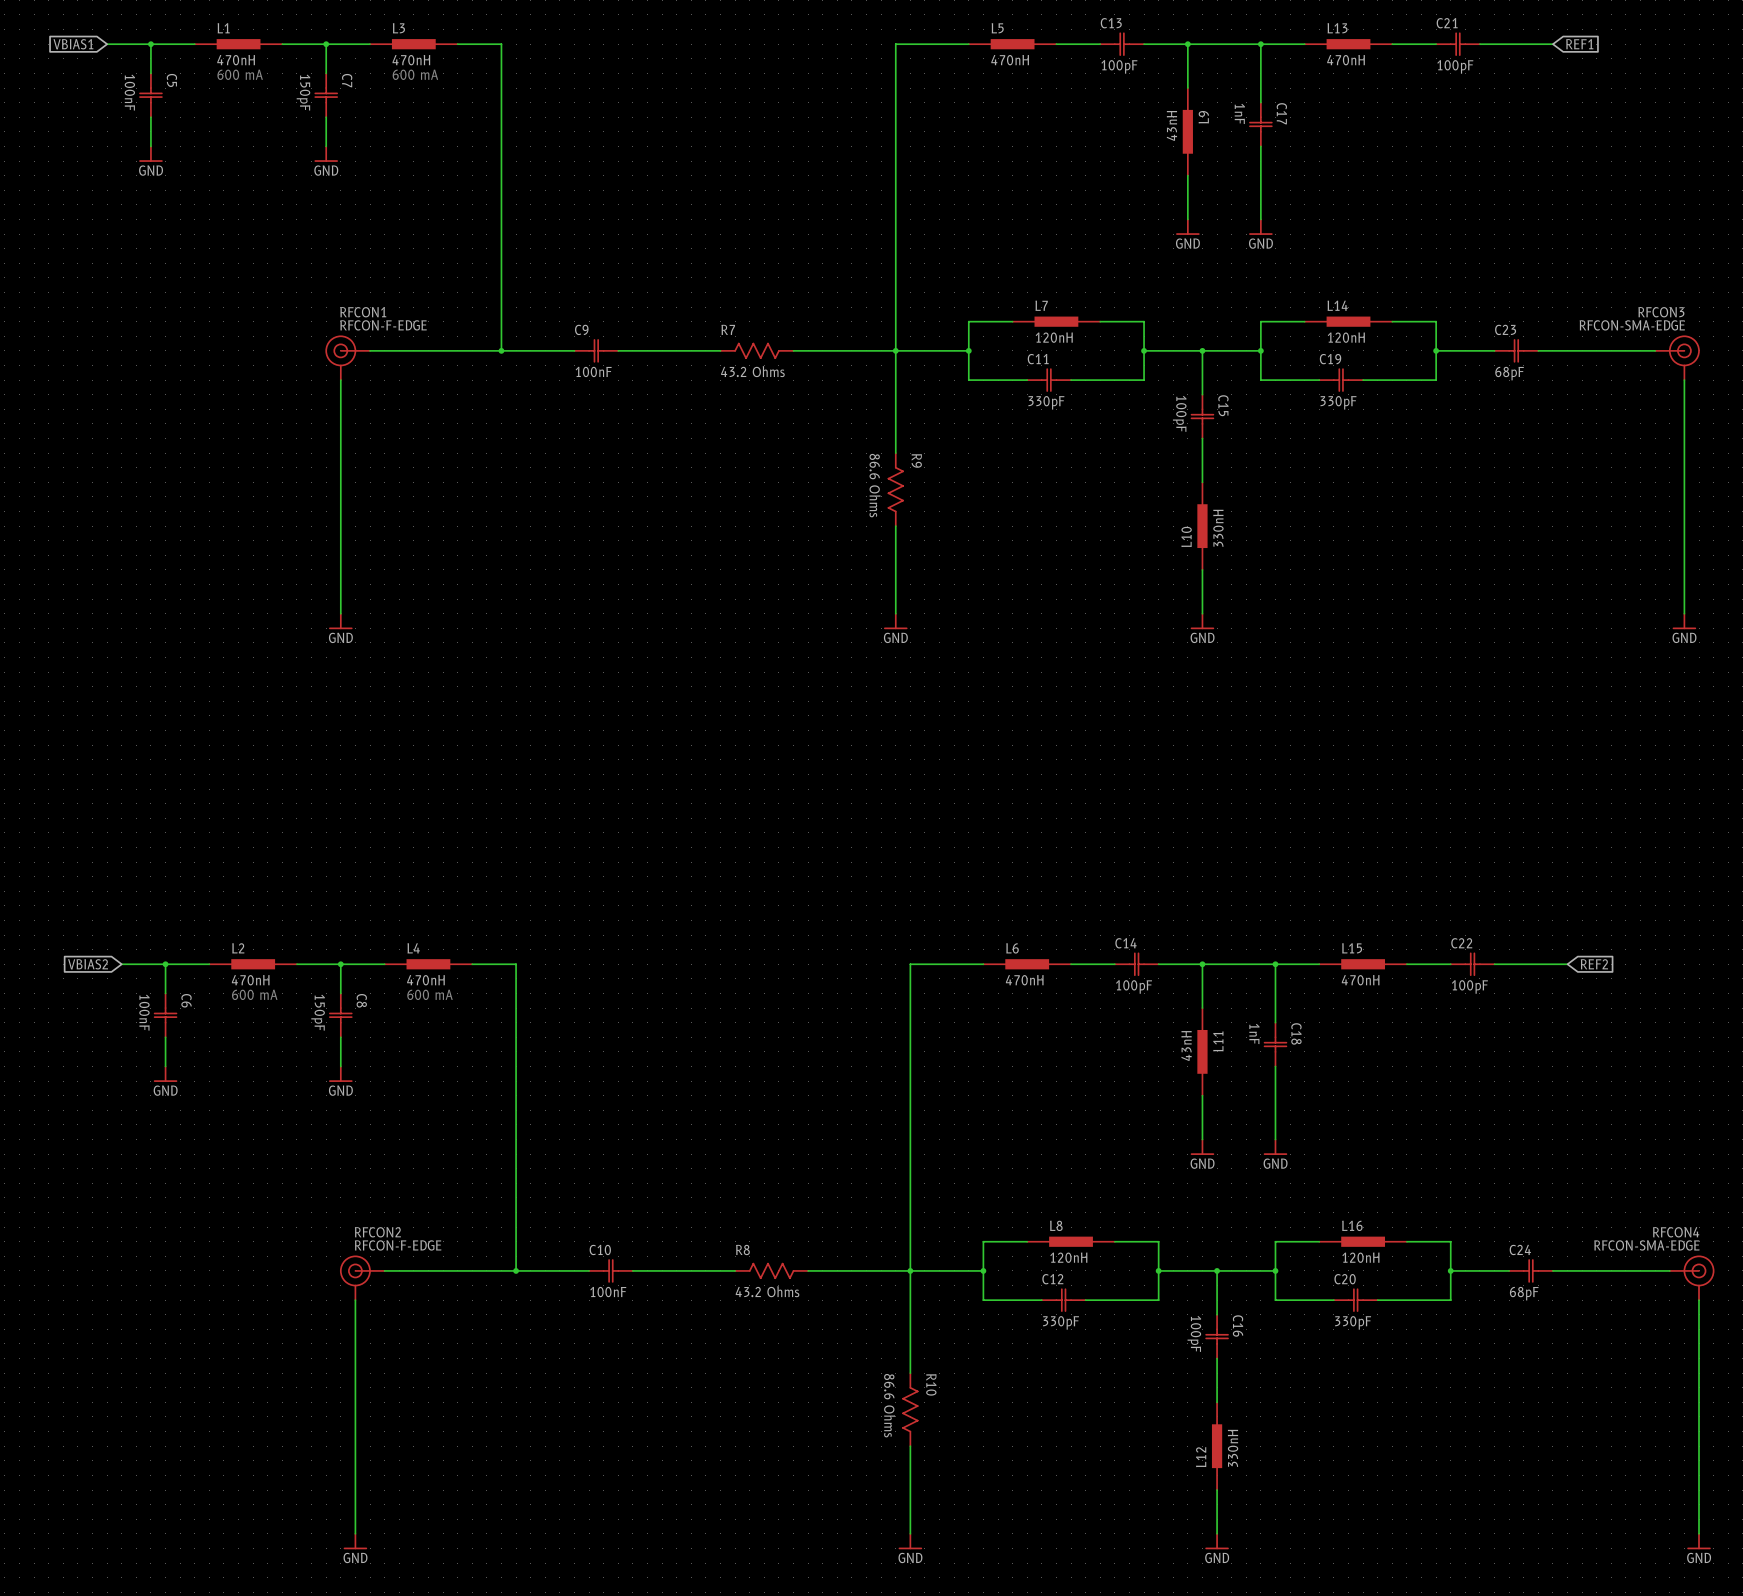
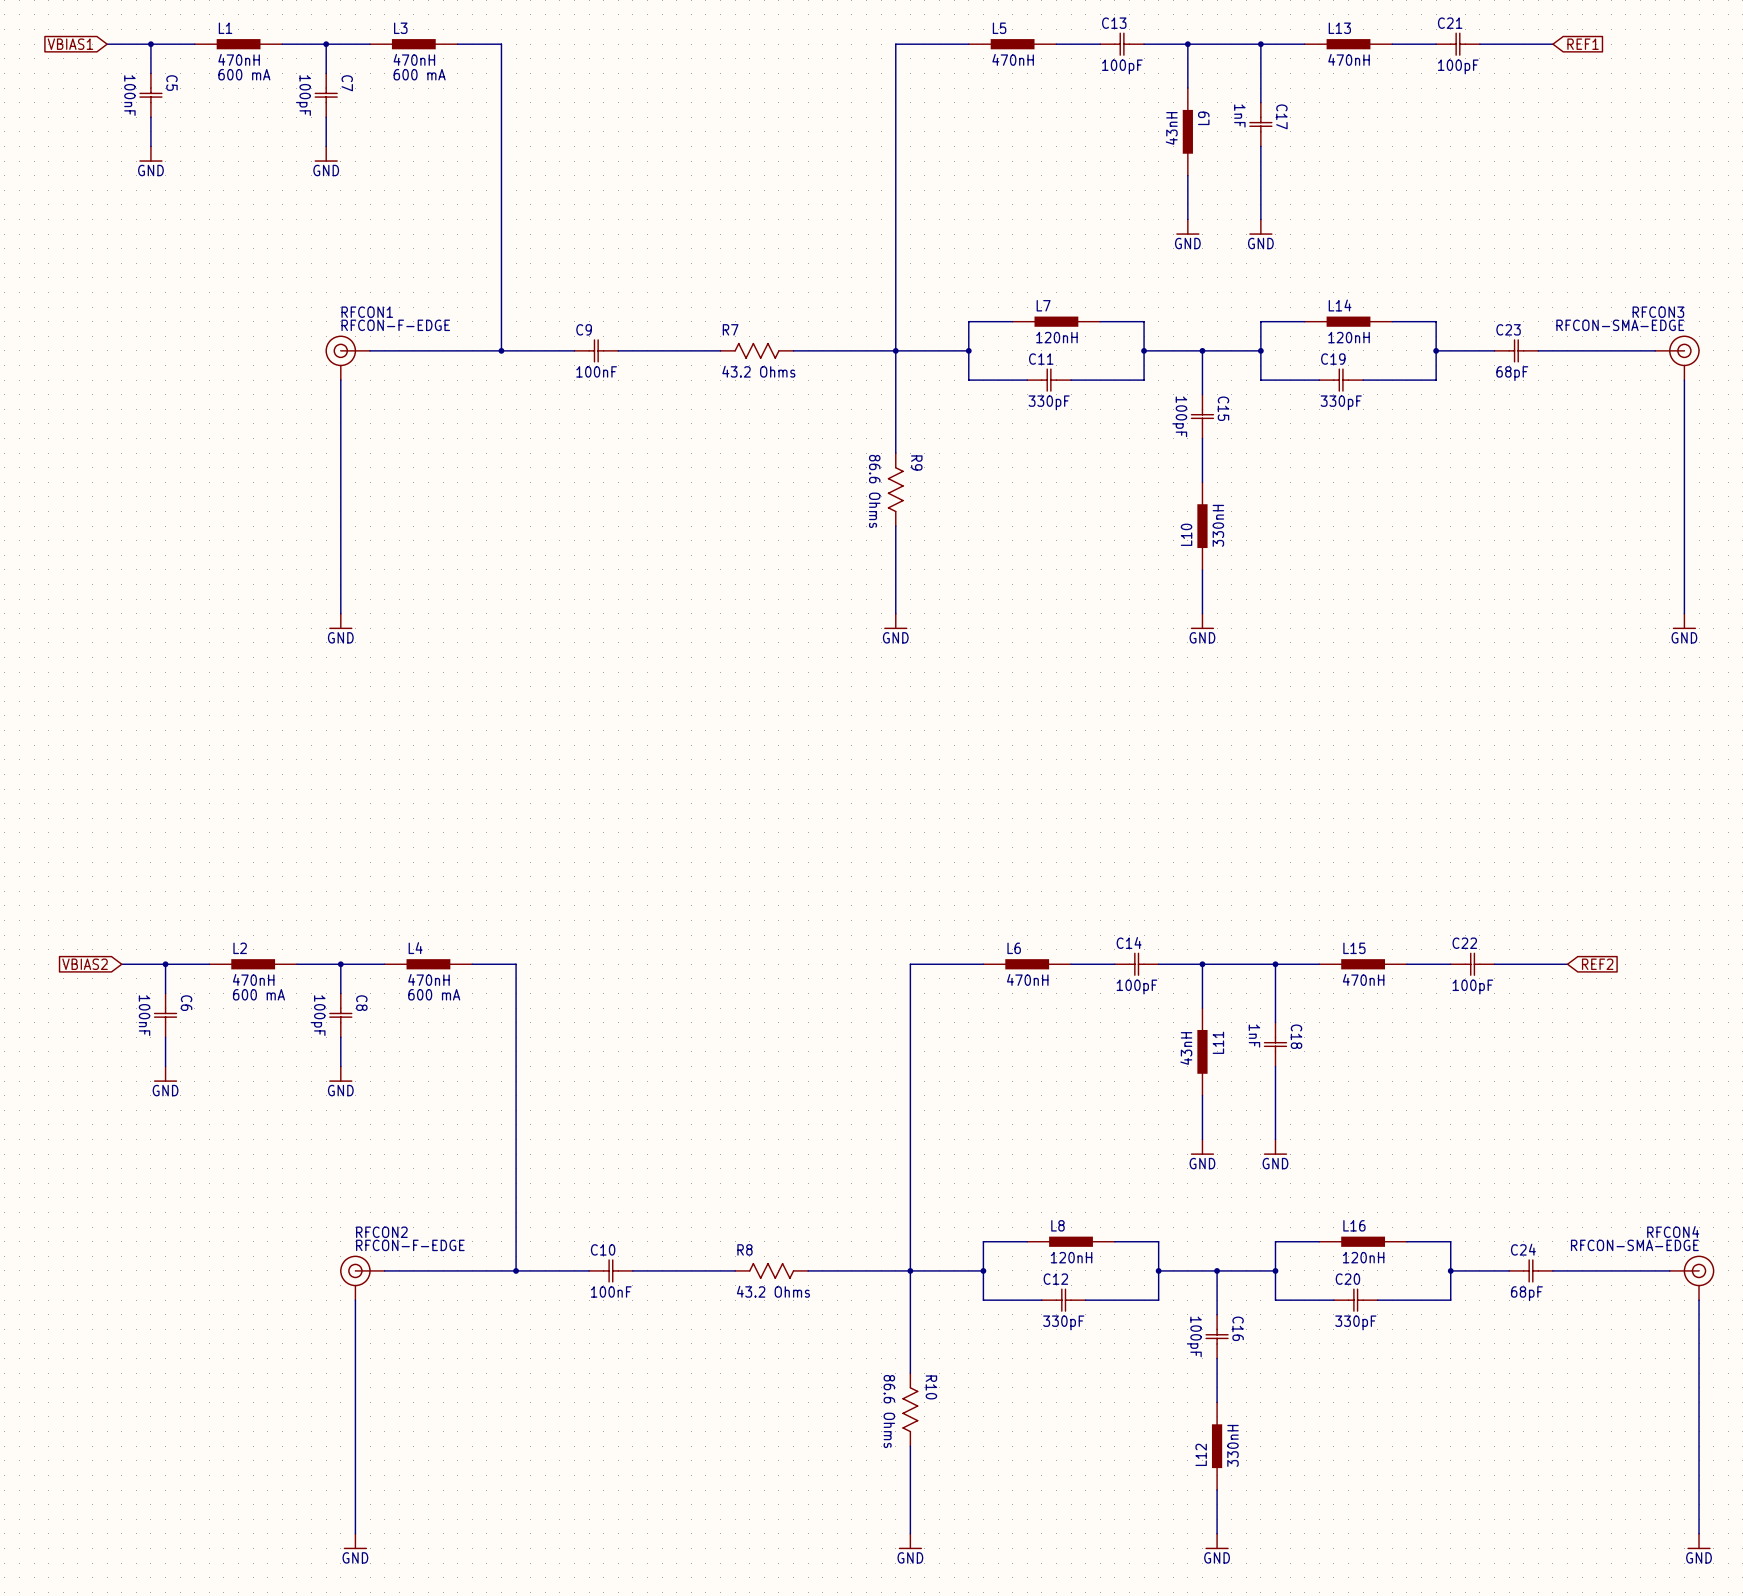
C7 value: 150pF (303, 92) -> 100pF (303, 95)
C8 value: 150pF (318, 1012) -> 100pF (318, 1015)

